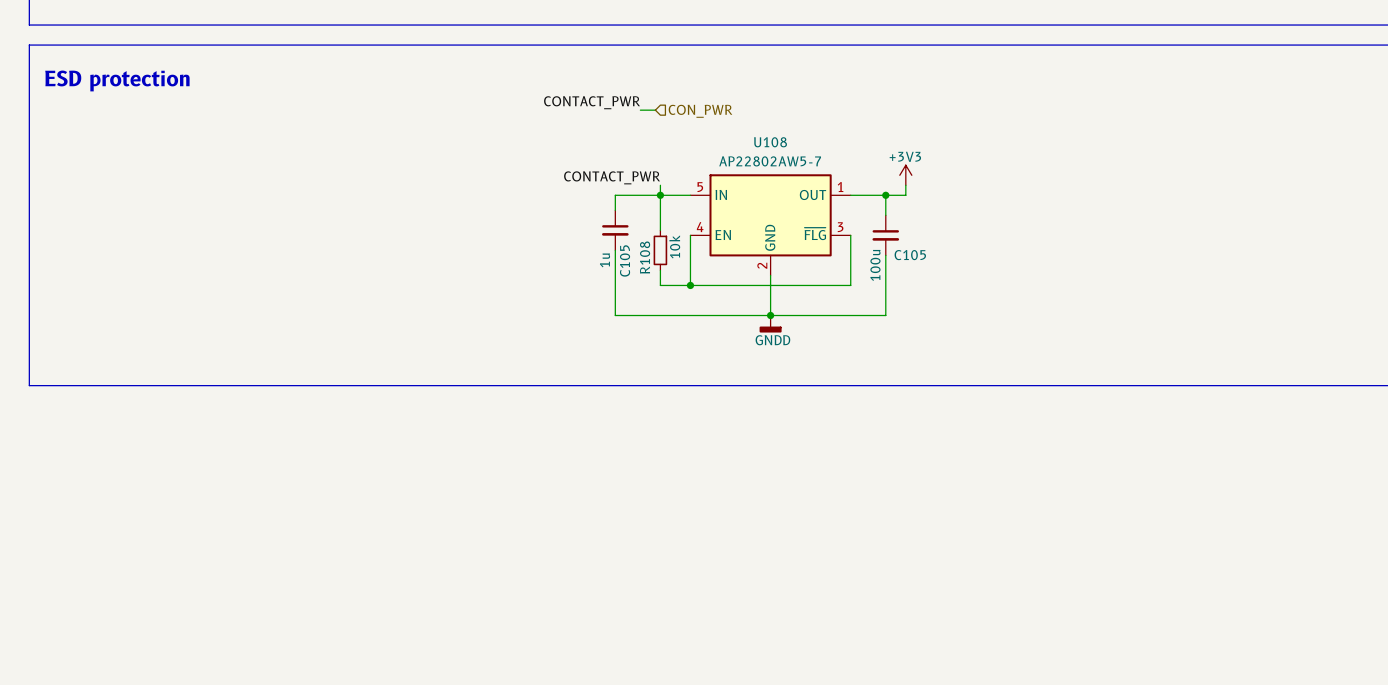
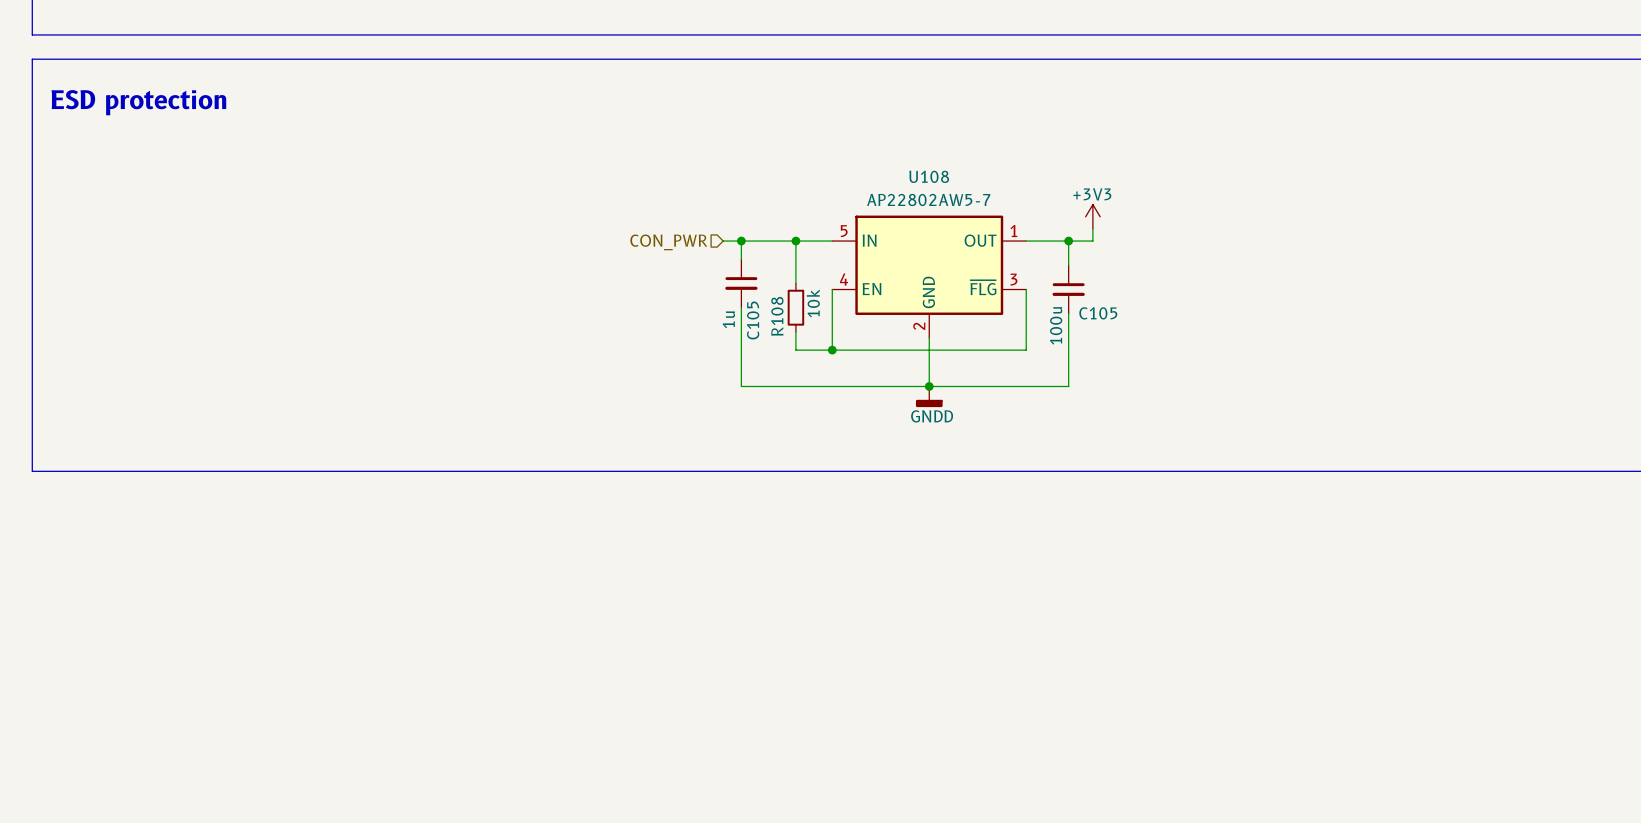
label: CONTACT_PWR (592, 102) -> none
wire: (640, 110) (655, 110) -> (723, 241) (741, 241)
hierarchical label rotation: 0° (700, 111) -> 180° (668, 242)
hierarchical label position: CON_PWR (700, 111) -> CON_PWR (668, 242)
label: CONTACT_PWR (612, 177) -> none
wire: (660, 185) (660, 195) -> none
junction: none -> (741, 241)

